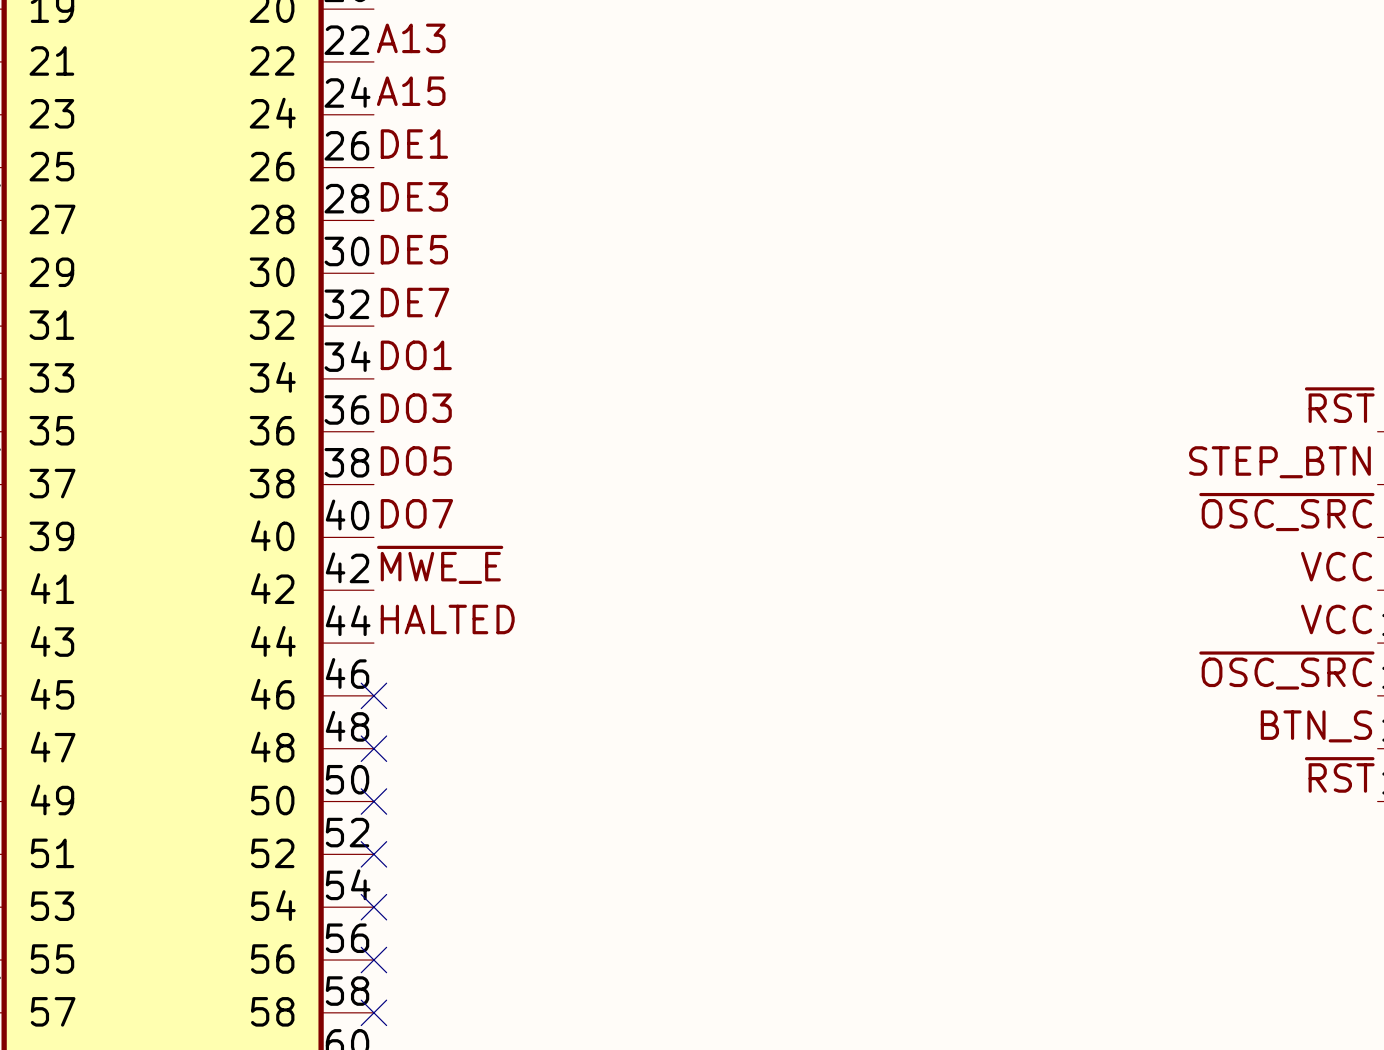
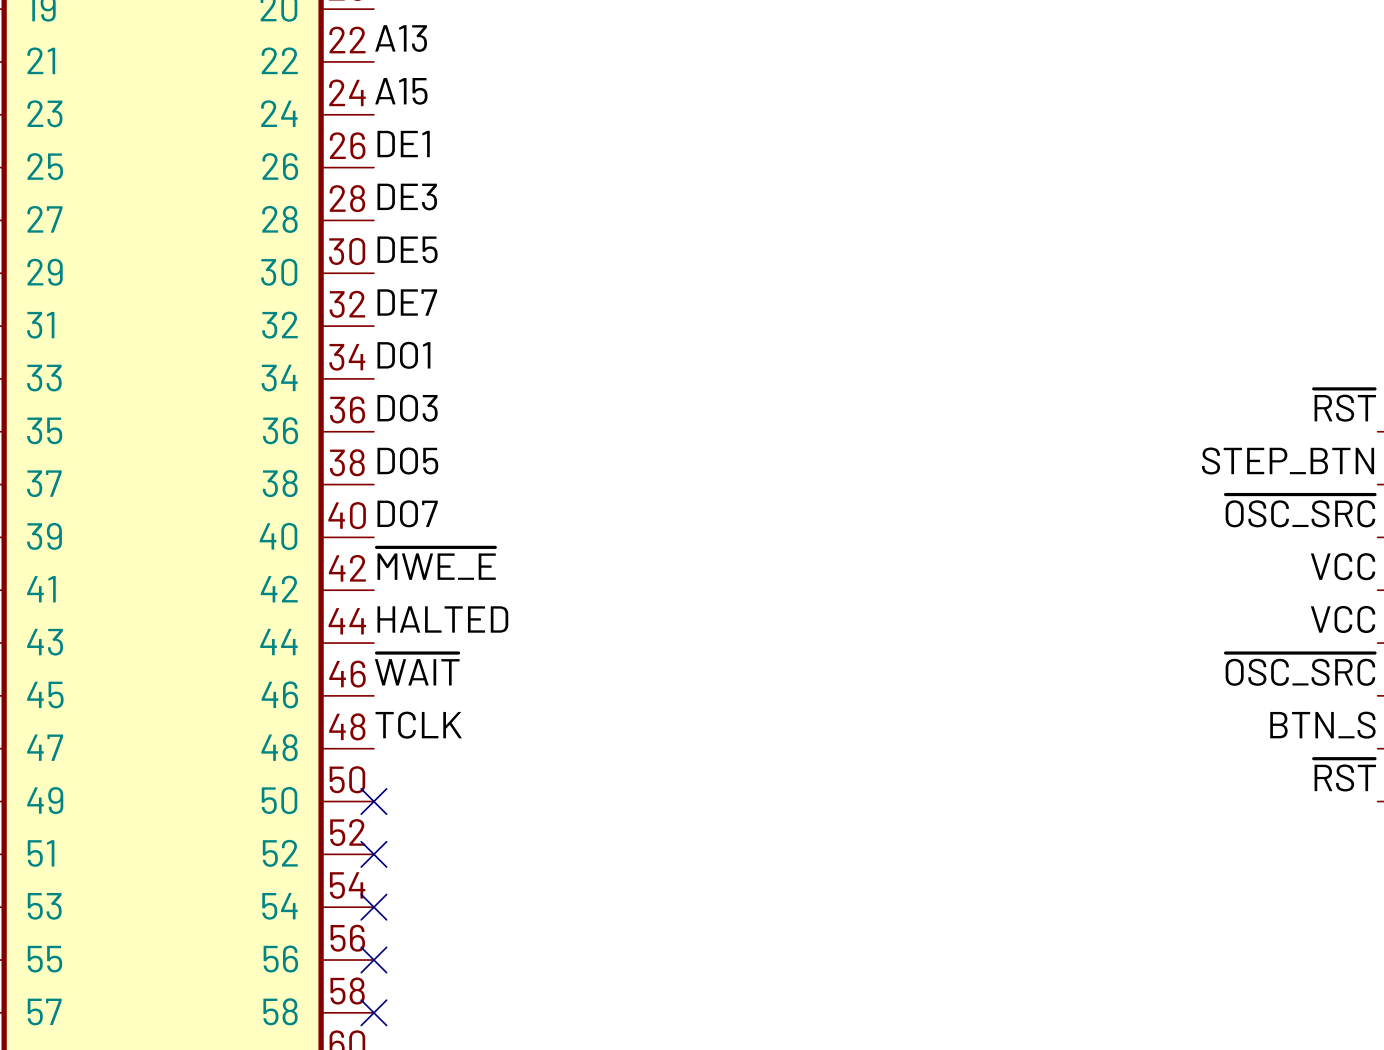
label: none -> ~{WAIT} (417, 669)
no-connect mark: (373, 695) -> none
label: none -> TCLK (418, 725)
no-connect mark: (373, 748) -> none

